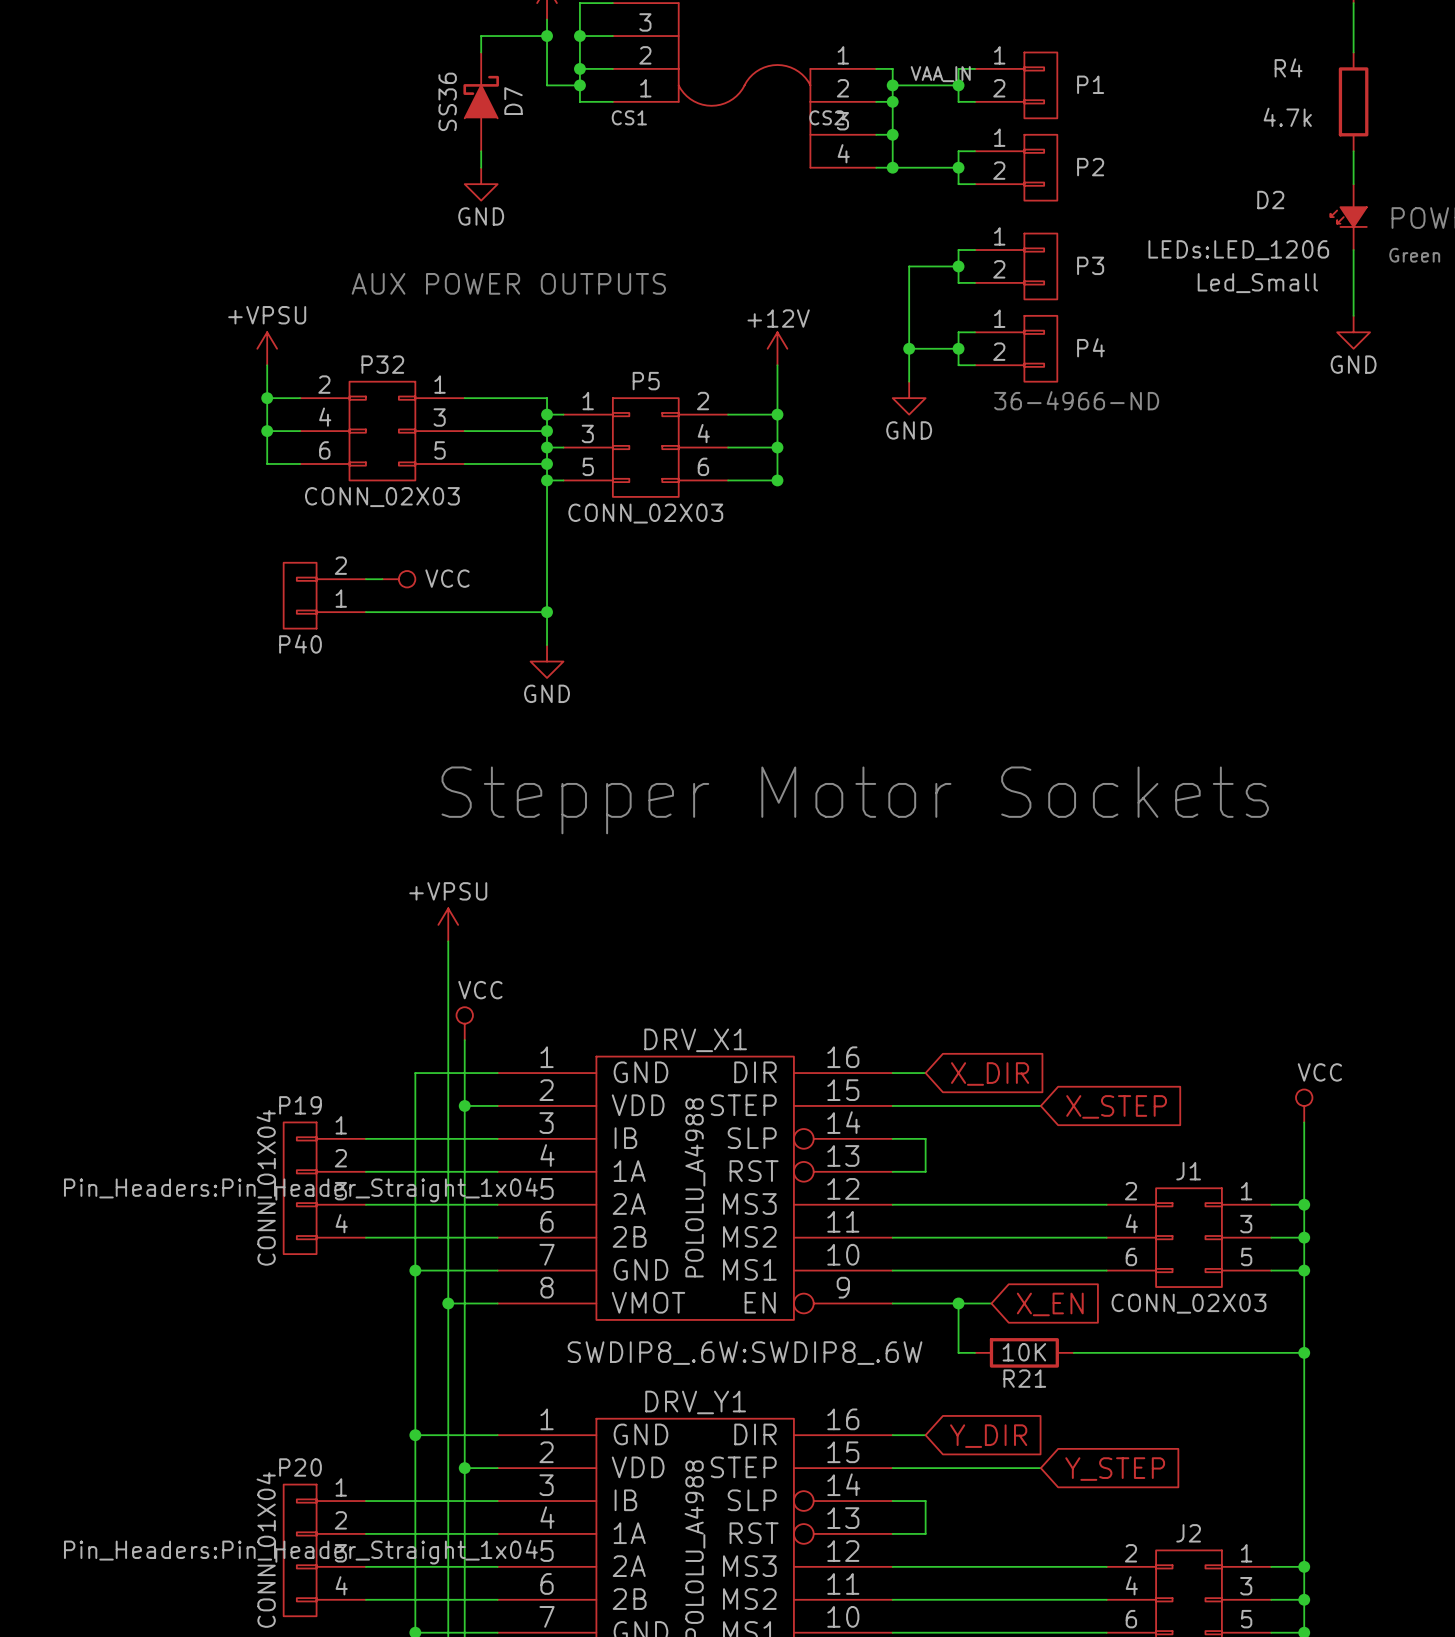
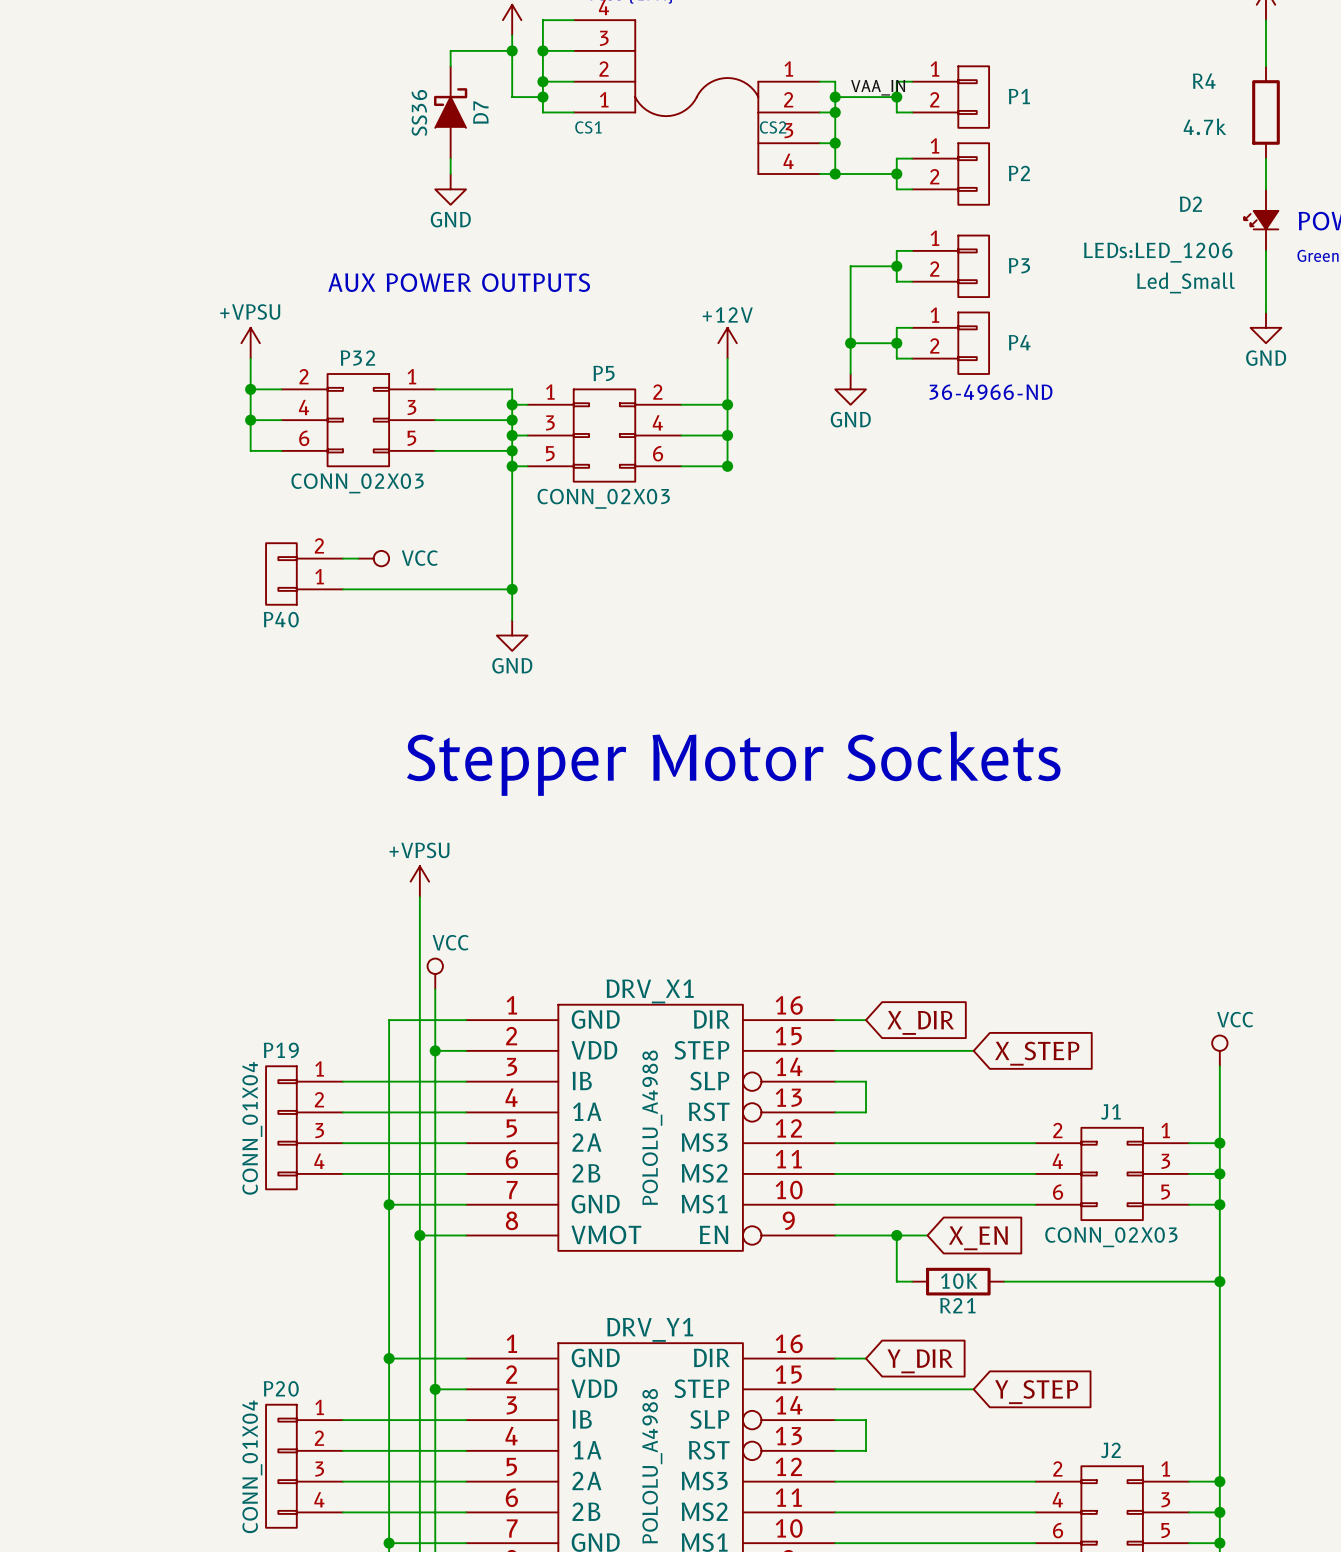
P19 text: Pin_Headers:Pin_Header_Straight_1x04 (300, 1190) -> none
DRV_X1 text: SWDIP8_.6W:SWDIP8_.6W (745, 1353) -> none
P20 text: Pin_Headers:Pin_Header_Straight_1x04 (300, 1552) -> none

